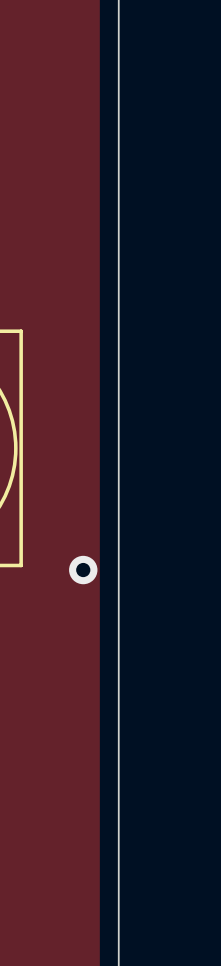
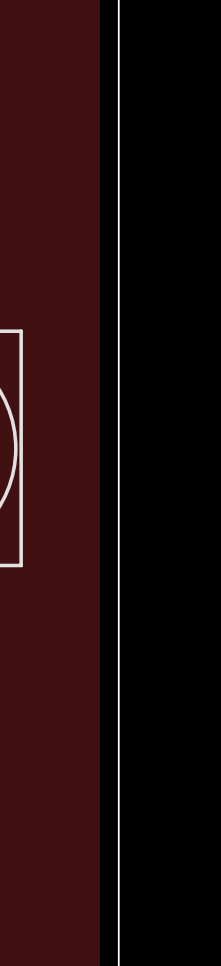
via: (83, 570) -> none

